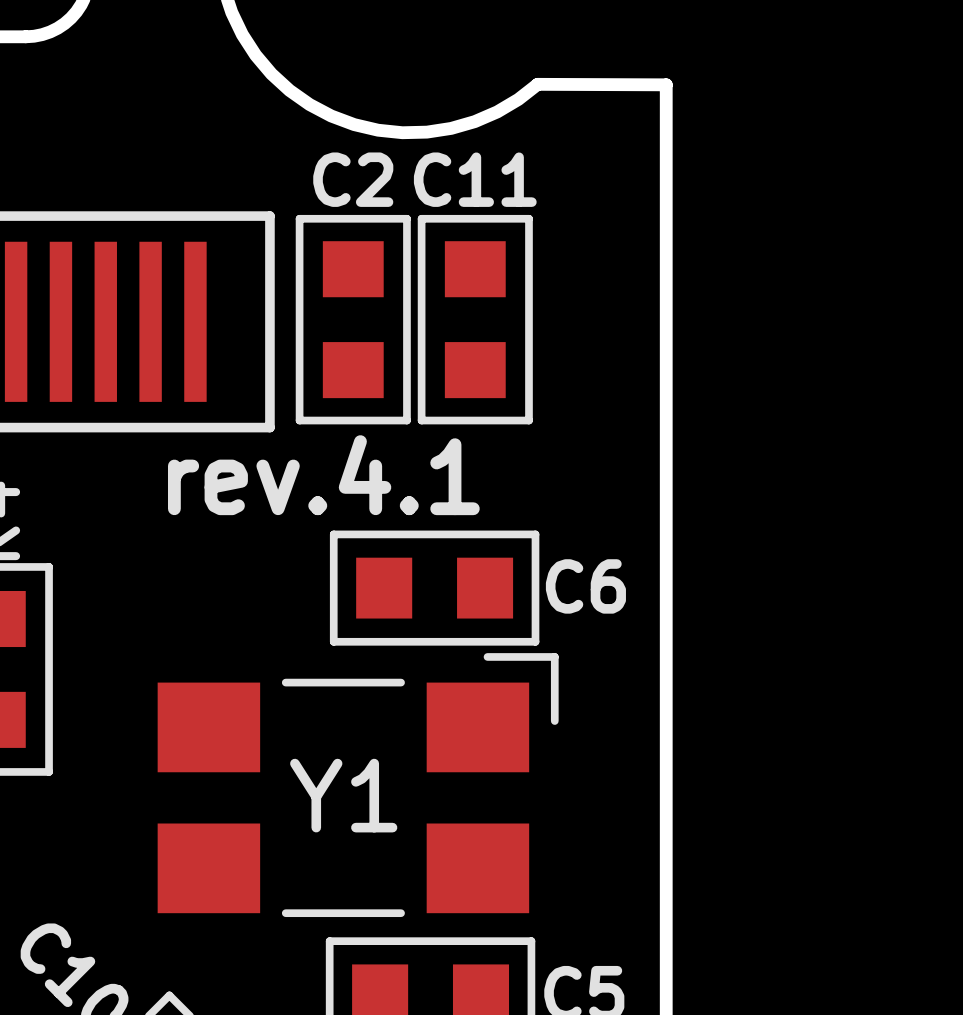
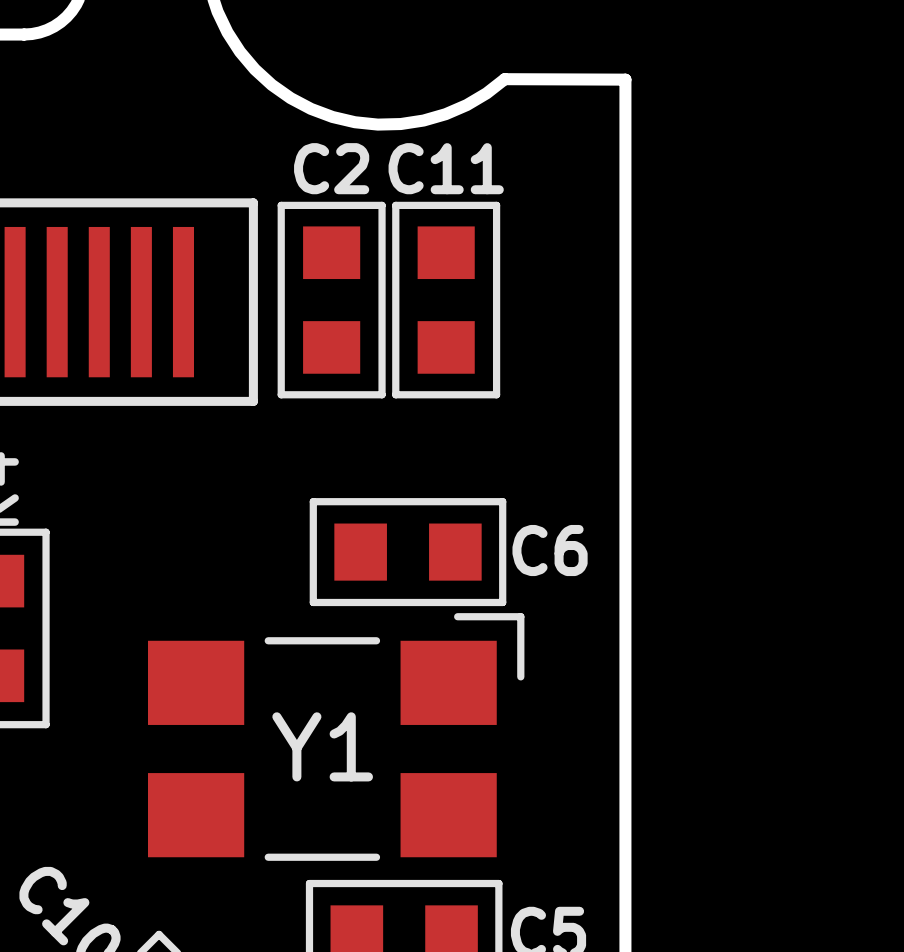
text: rev.4.1 (323, 475) -> none

